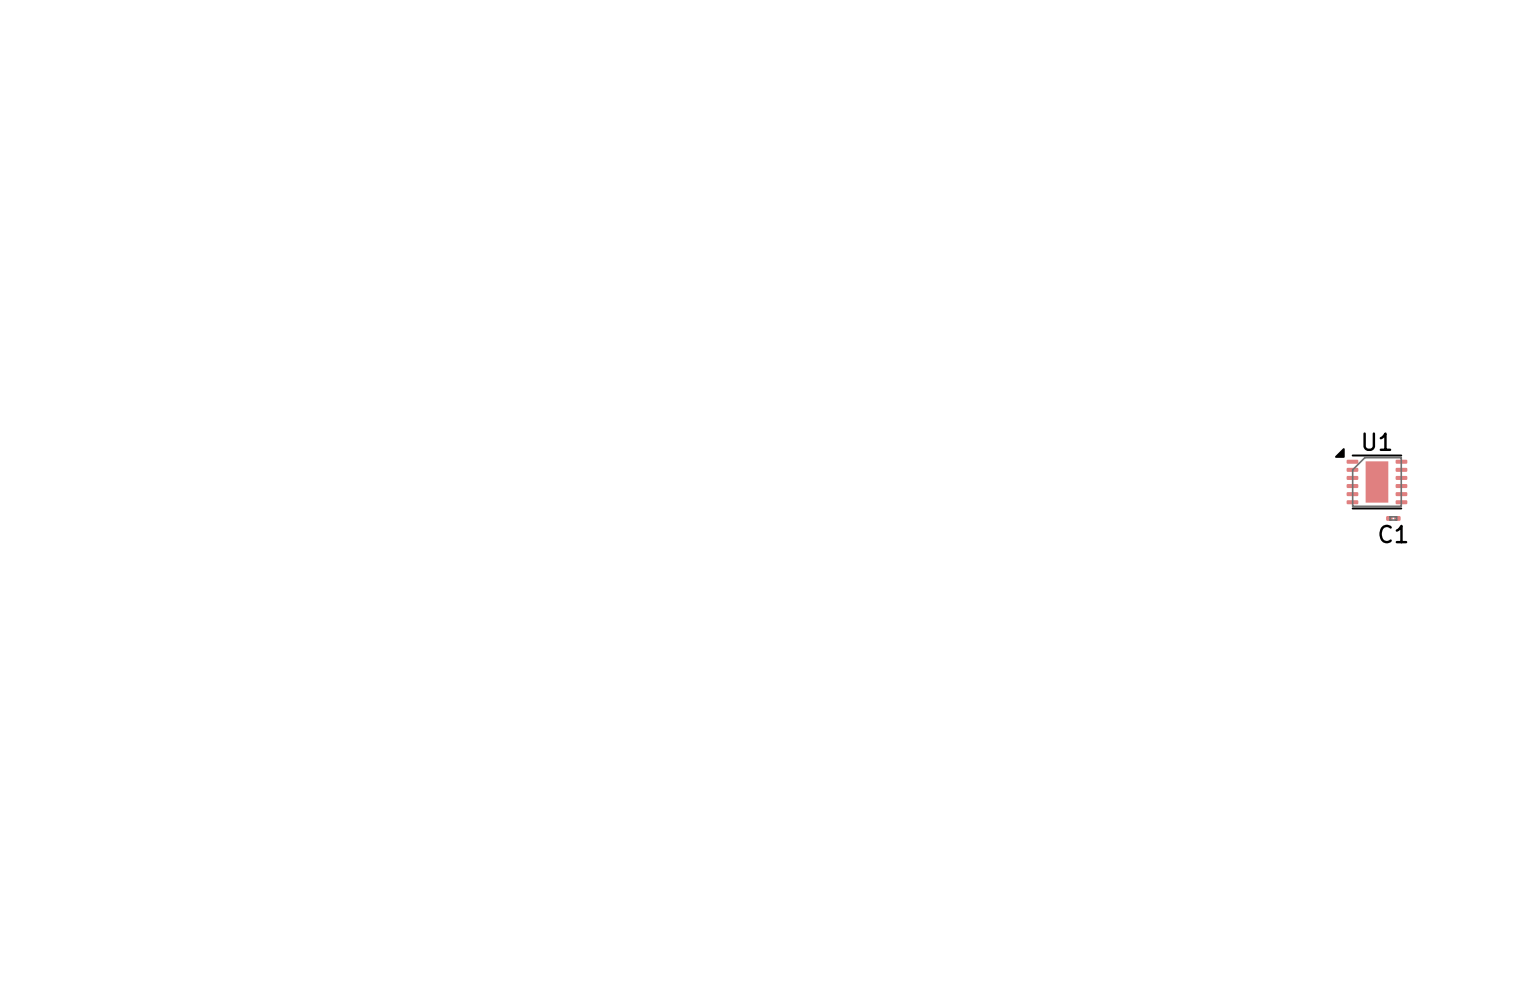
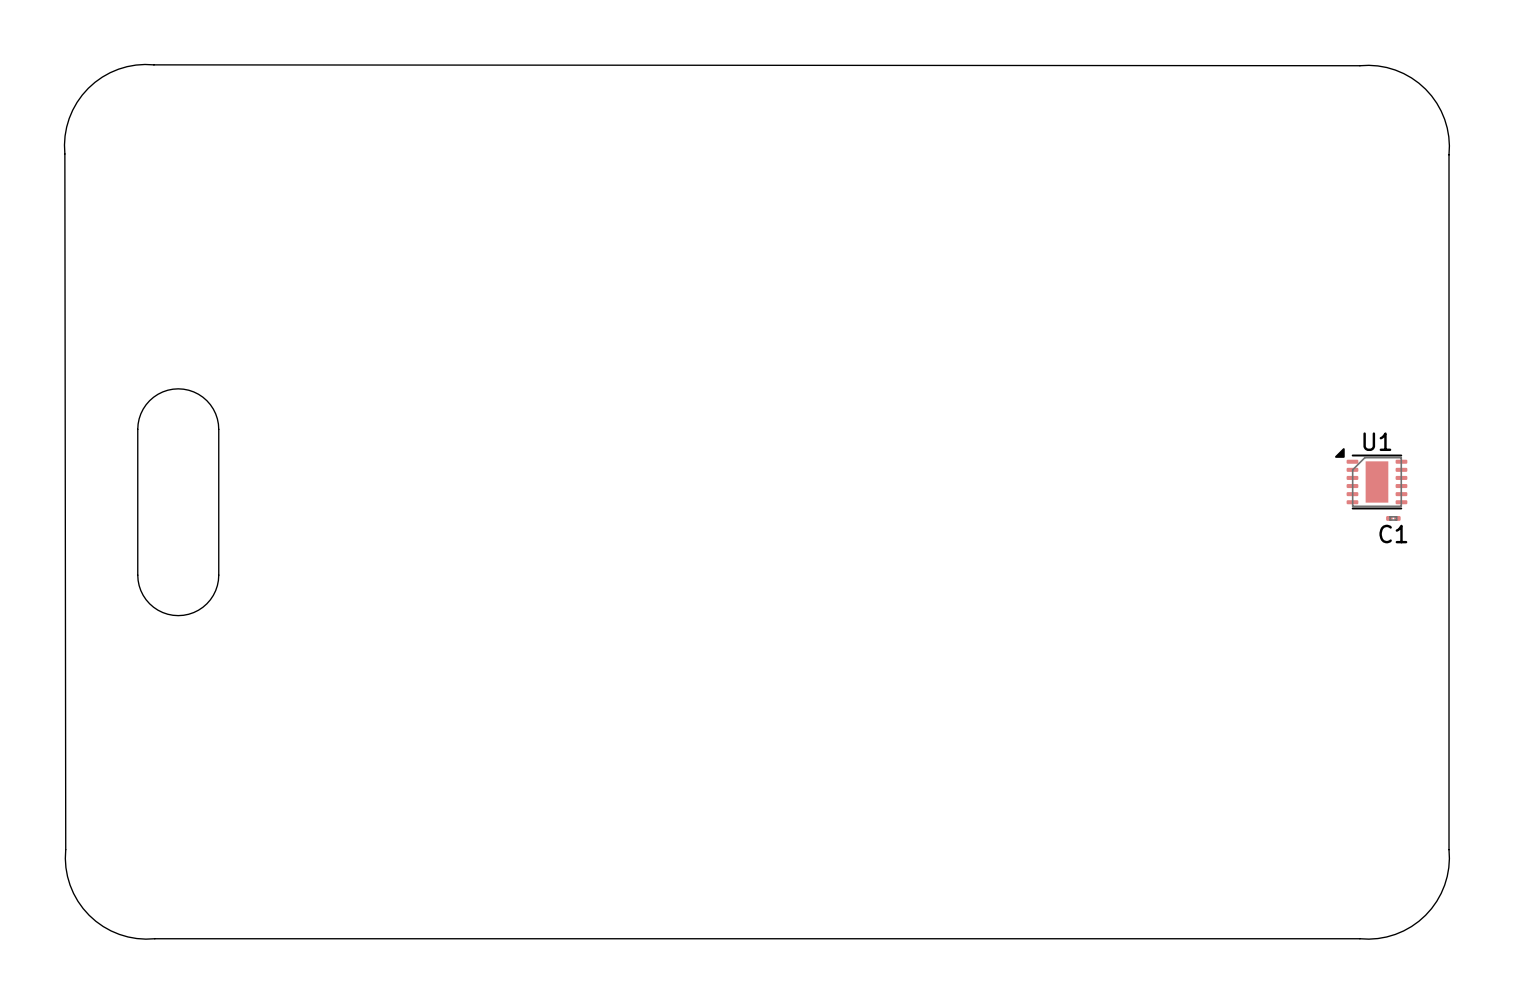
board edge: none -> (153, 64) (1368, 65) (1386, 67) (1411, 77) (1425, 89) (1436, 103) (1447, 127) (1449, 145) (1449, 858) (1447, 876) (1436, 901) (1425, 915) (1411, 926) (1386, 936) (1368, 939) (145, 939) (127, 936) (103, 926) (89, 915) (77, 901) (67, 876) (65, 858) (64, 144) (69, 118) (77, 102) (88, 88) (102, 77) (118, 69) (135, 65) (153, 64)
board edge: none -> (137, 429) (139, 585) (146, 599) (158, 610) (172, 615) (188, 614) (206, 603) (213, 595) (218, 580) (217, 418) (210, 404) (198, 394) (183, 389) (172, 389) (158, 394) (149, 400) (140, 413) (137, 429)

